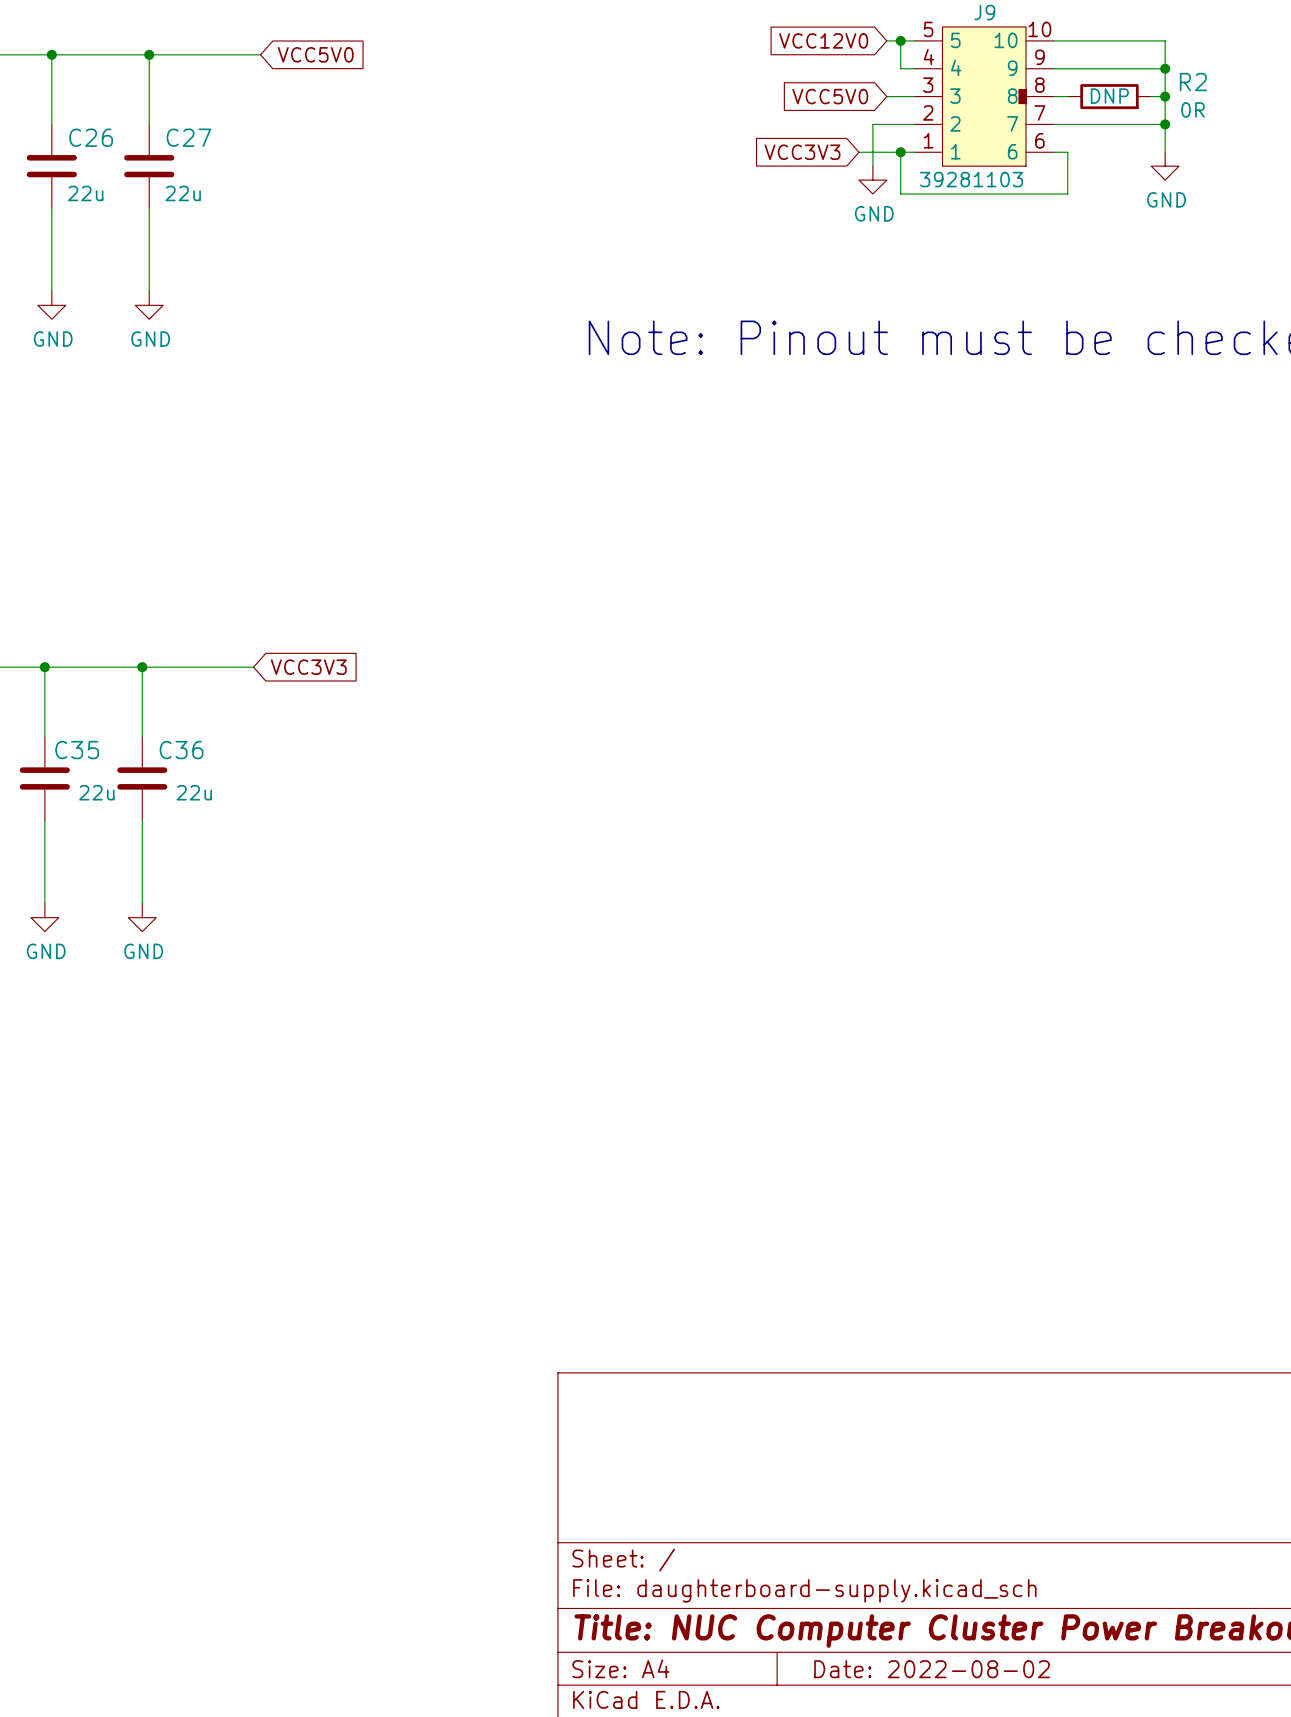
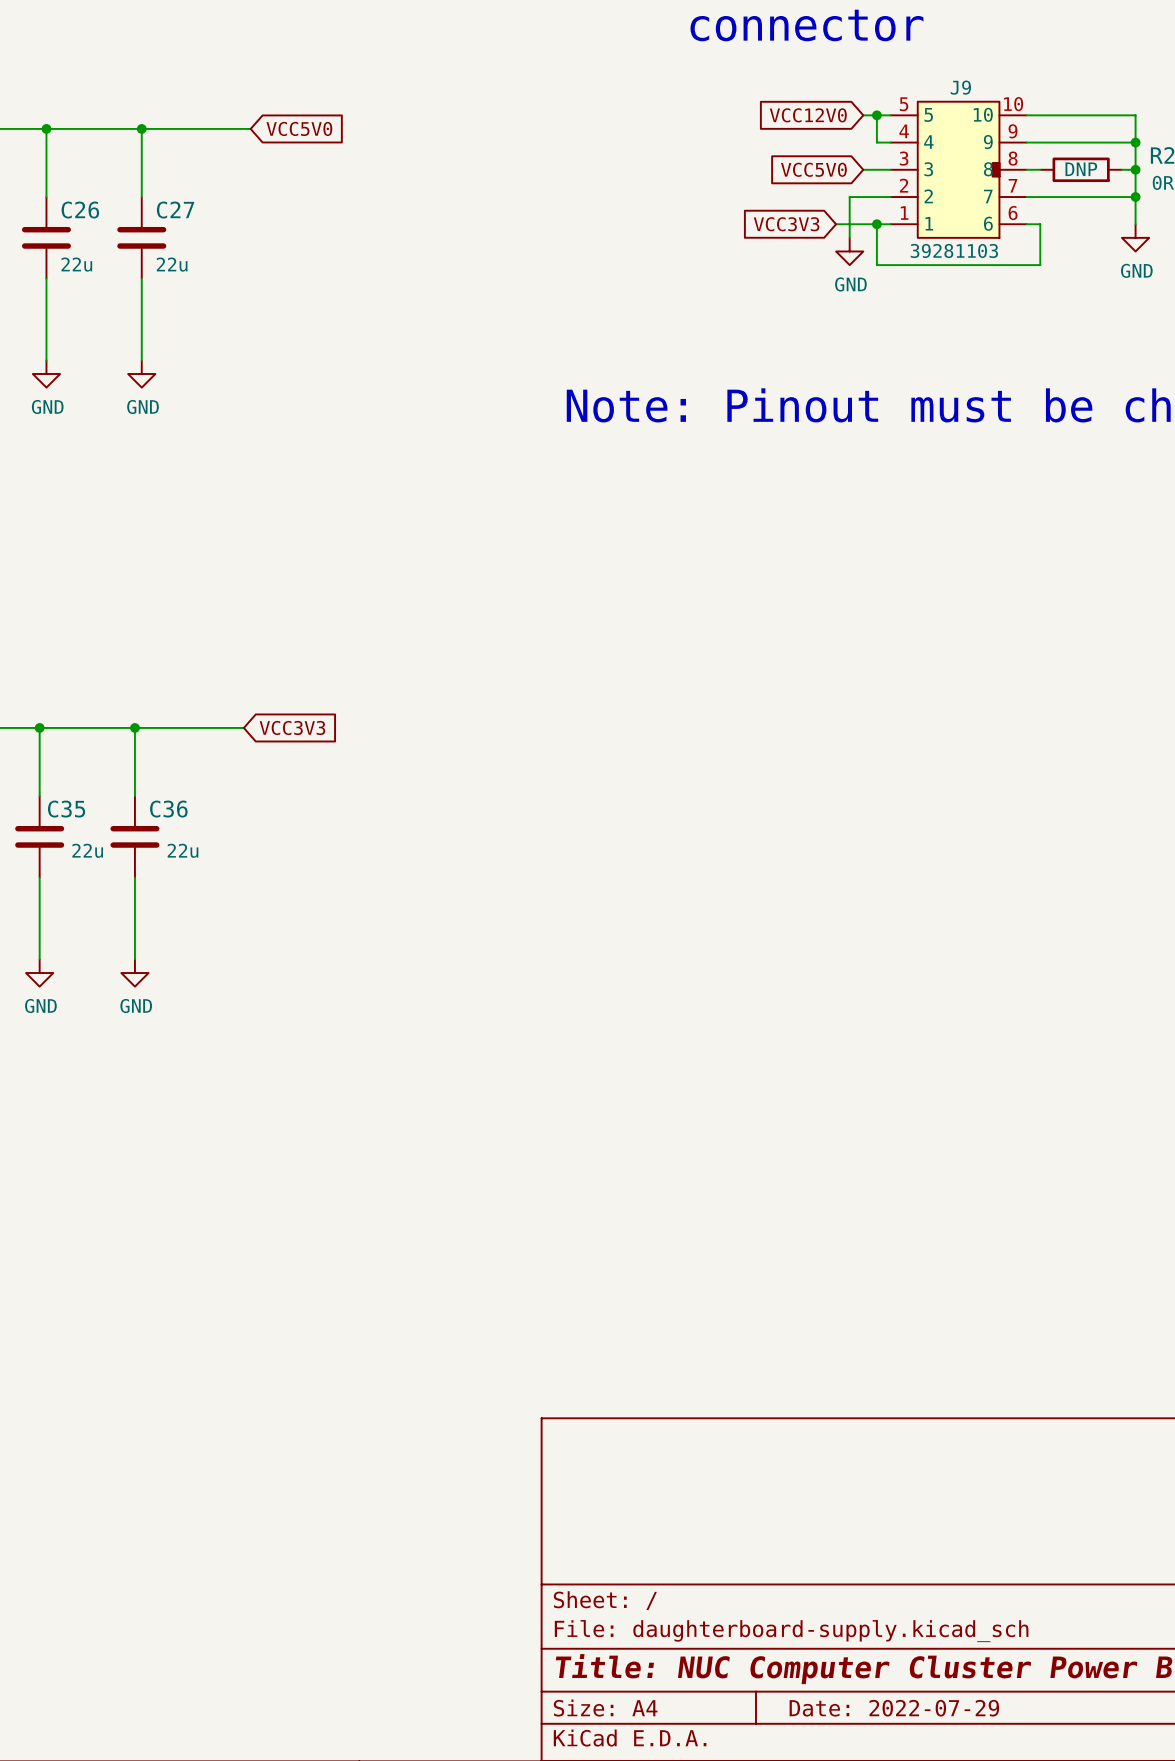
title block: Date: 2022-08-02 (932, 1669) -> Date: 2022-07-29 (894, 1708)

